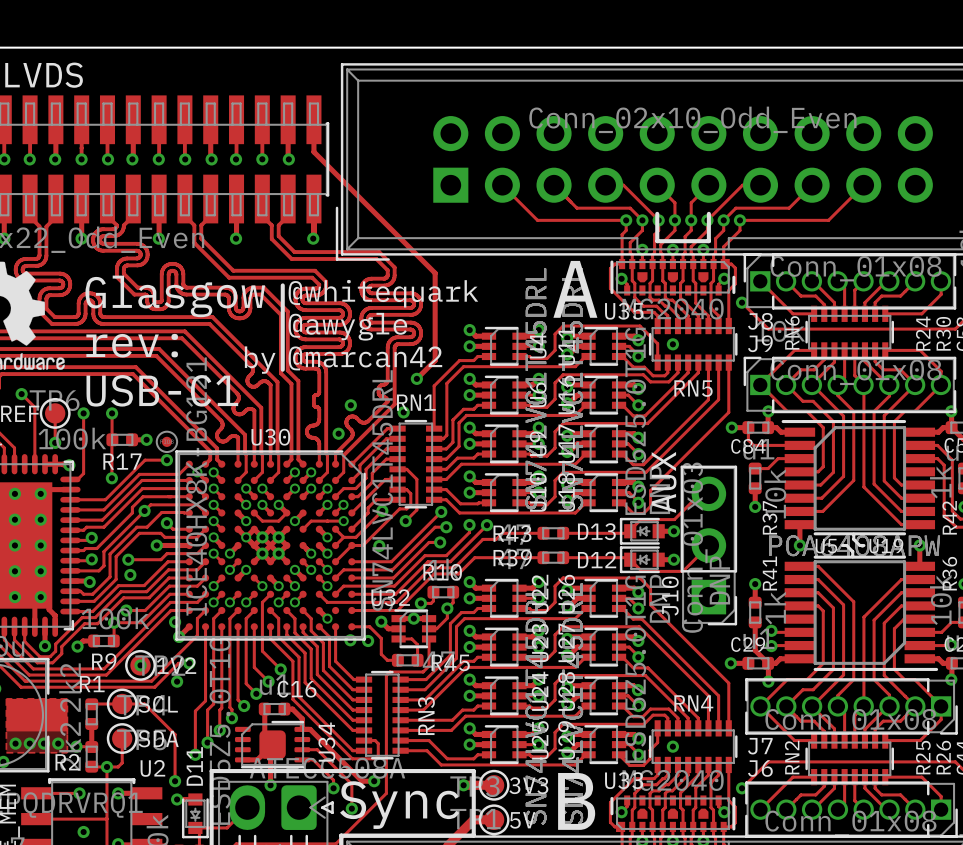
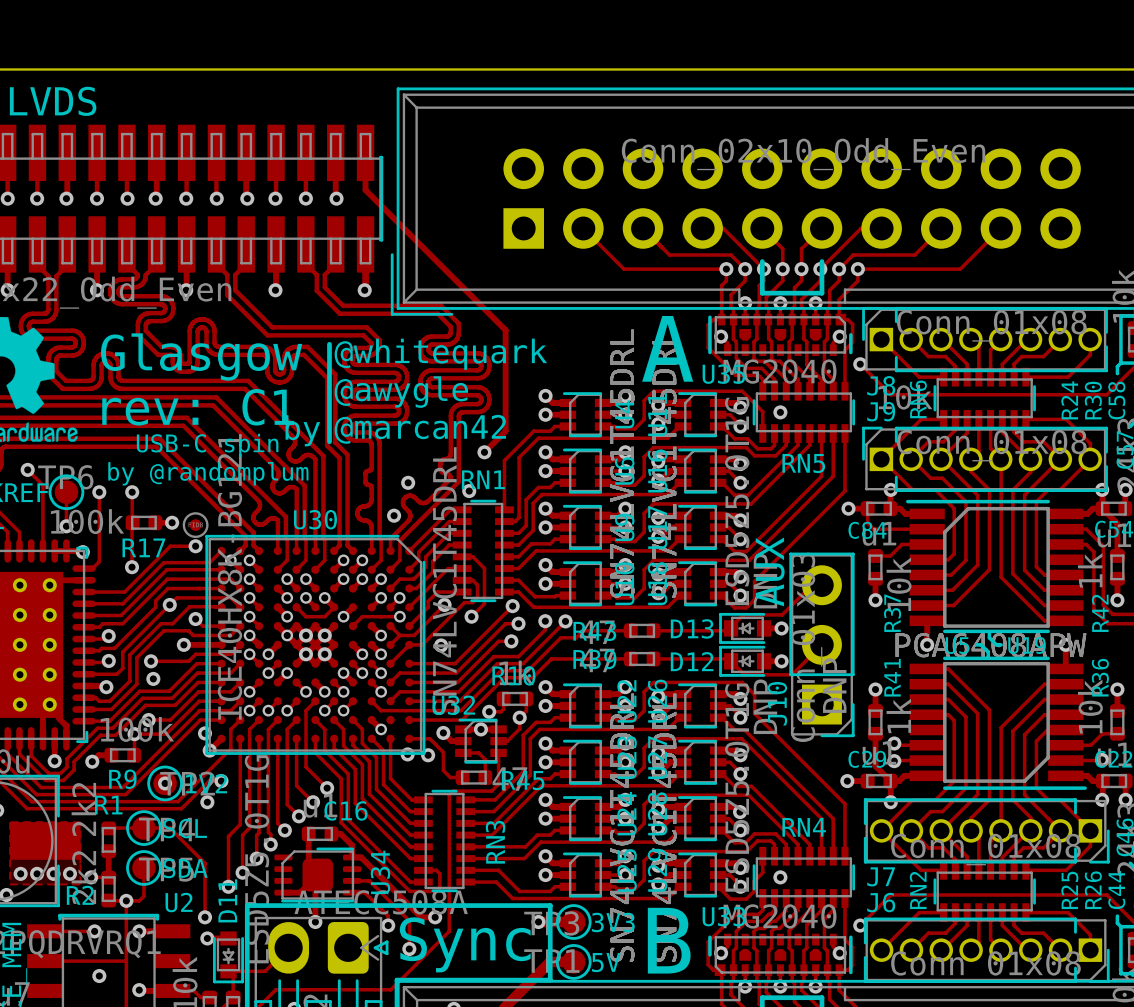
text: rev: (132, 345) -> rev: C1 (198, 407)
text: USB-C1 (162, 390) -> USB-C spin (207, 445)
text: none -> by @randomplum (208, 473)

